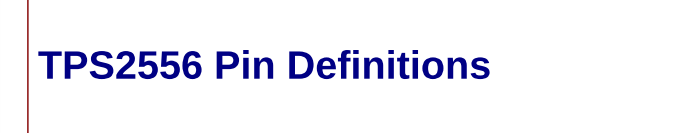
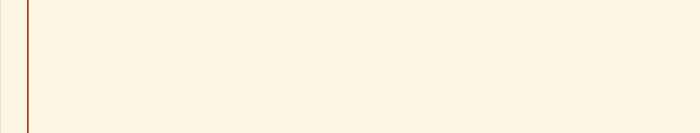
text: TPS2556 Pin Definitions (263, 64) -> none

